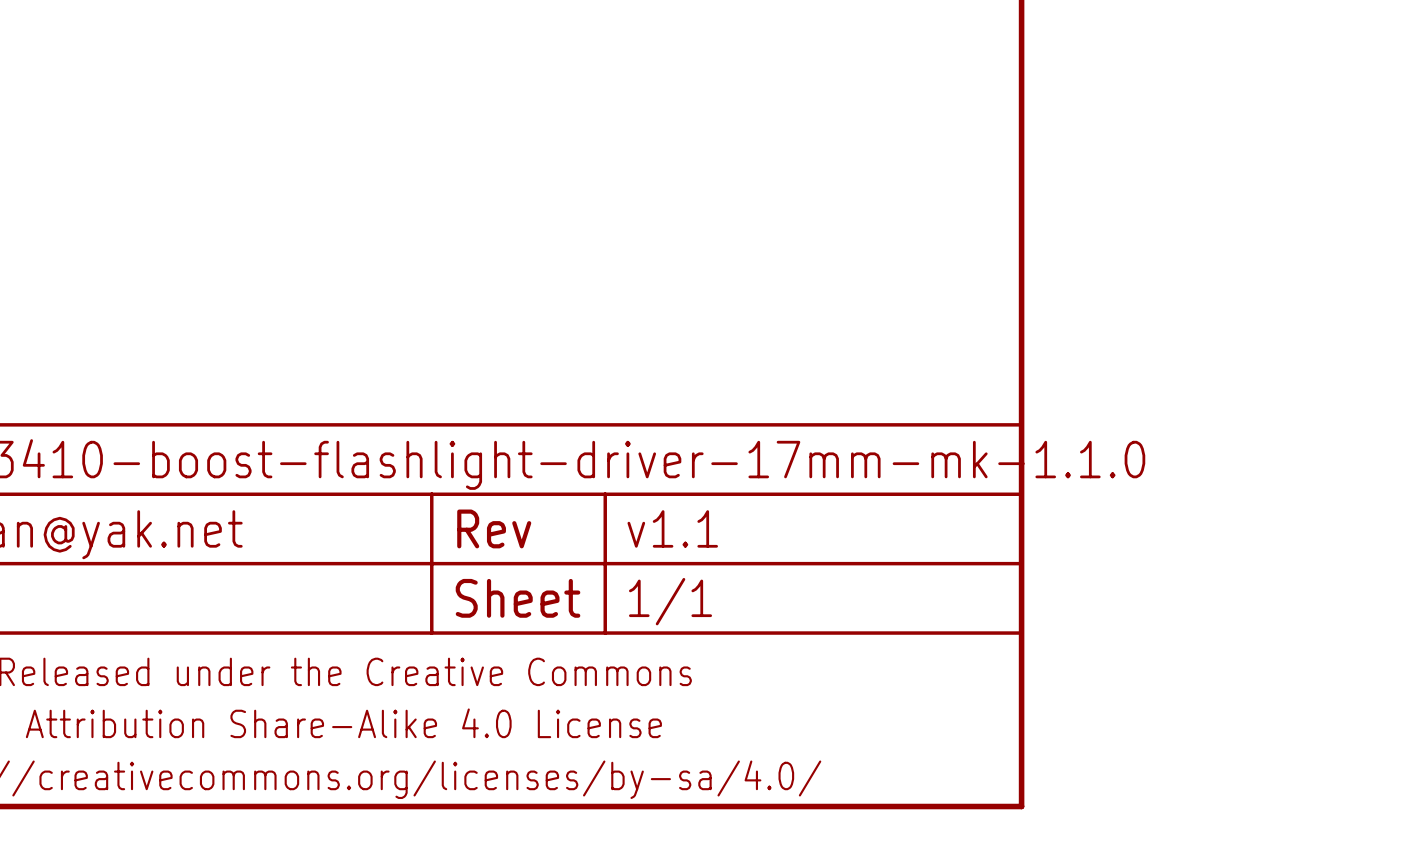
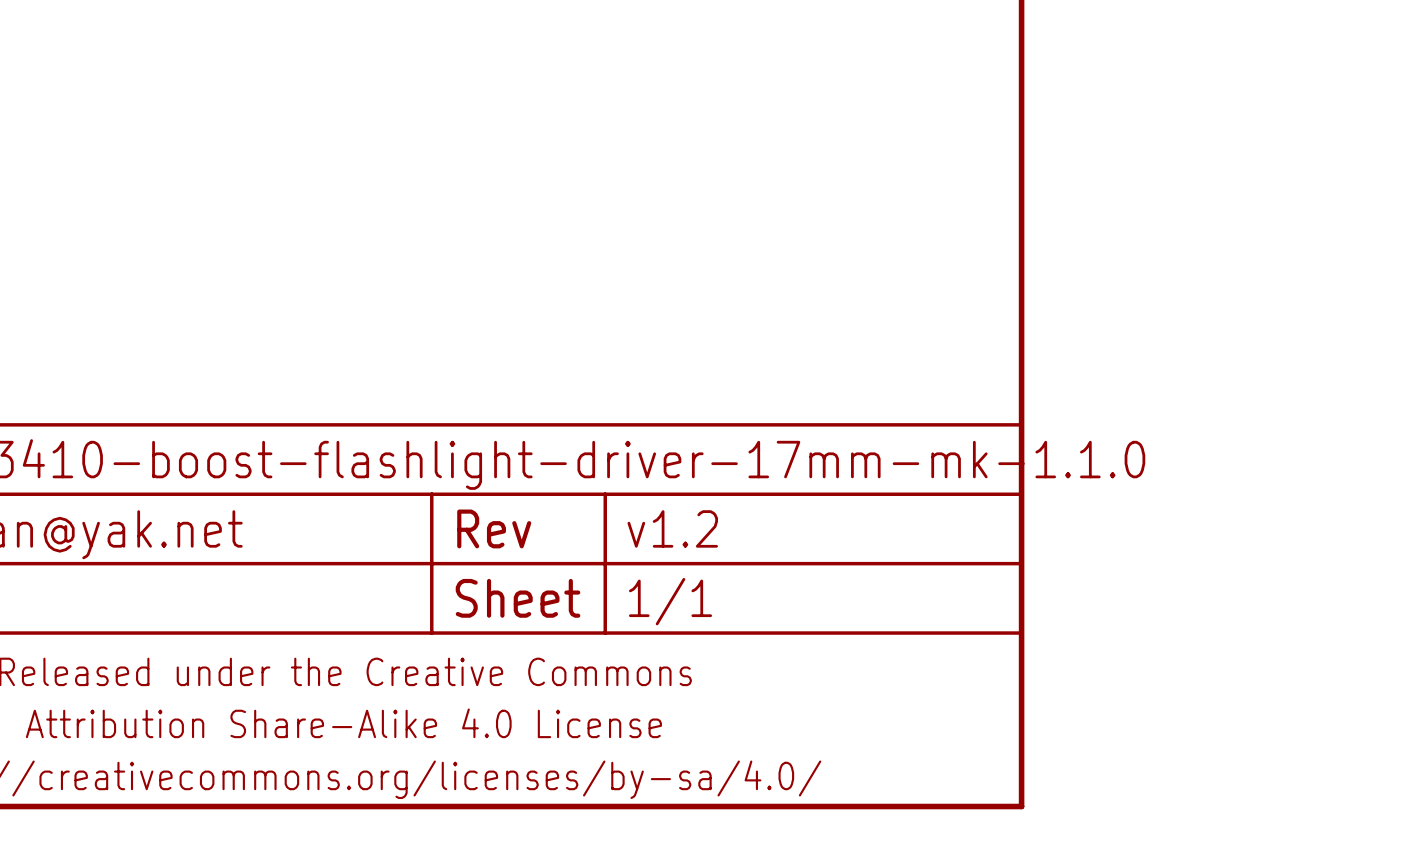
part text: v1.1 (672, 528) -> v1.2 (672, 528)

